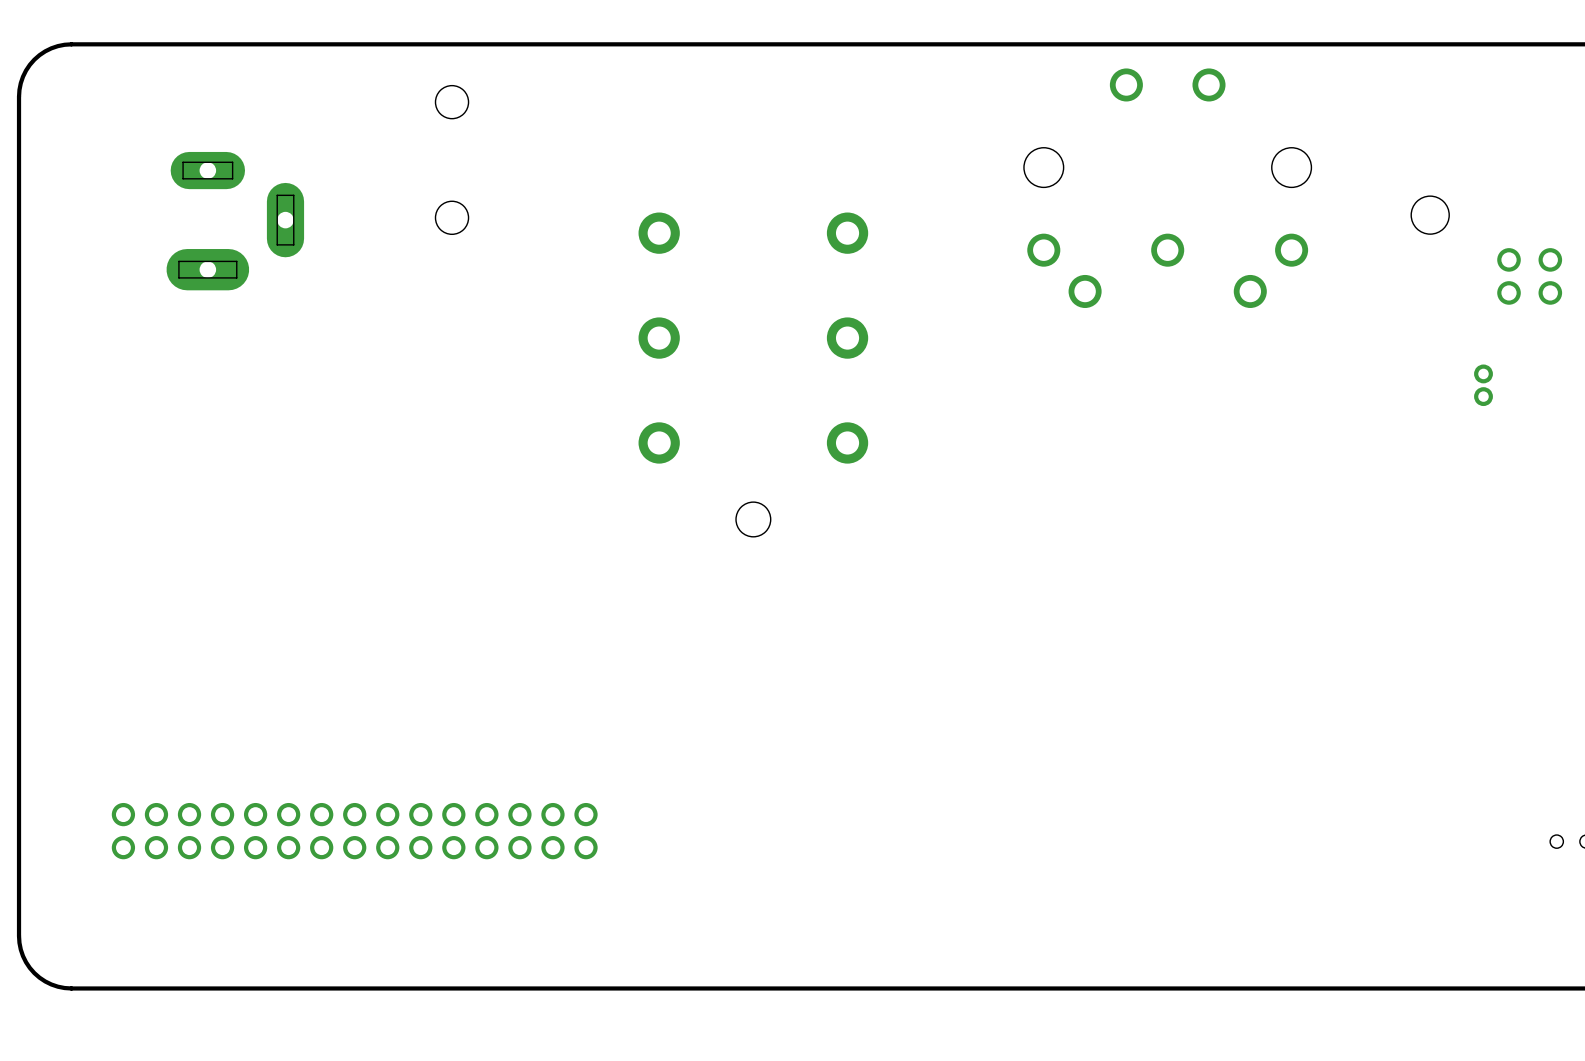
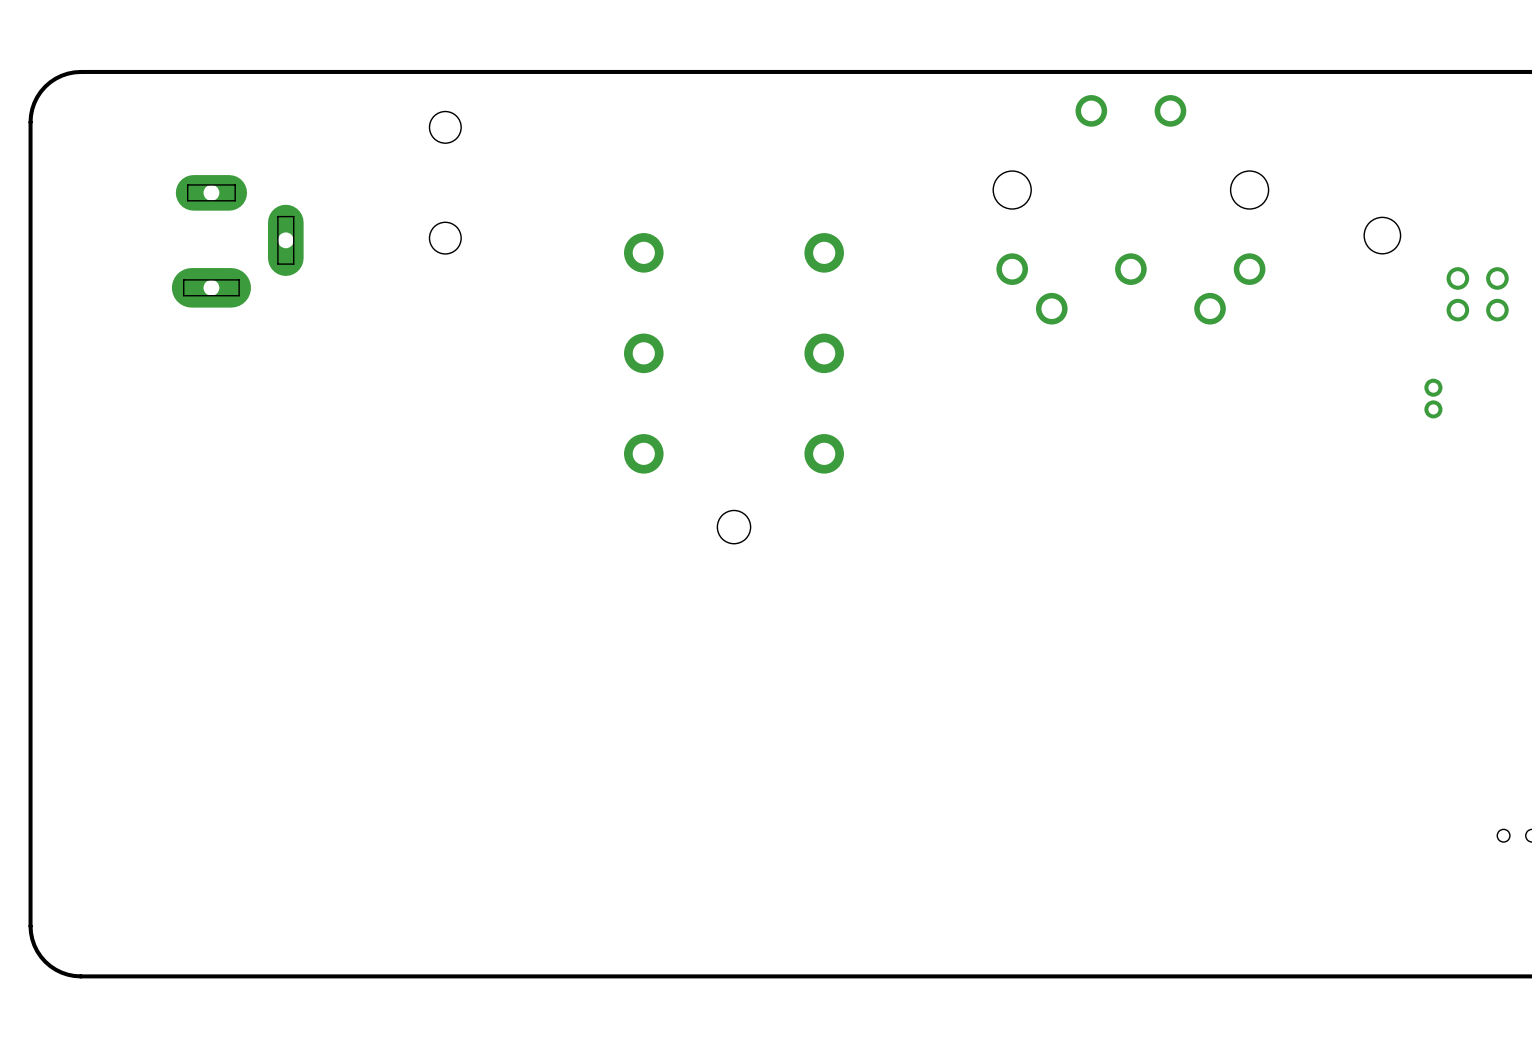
part: (354, 831) -> none

